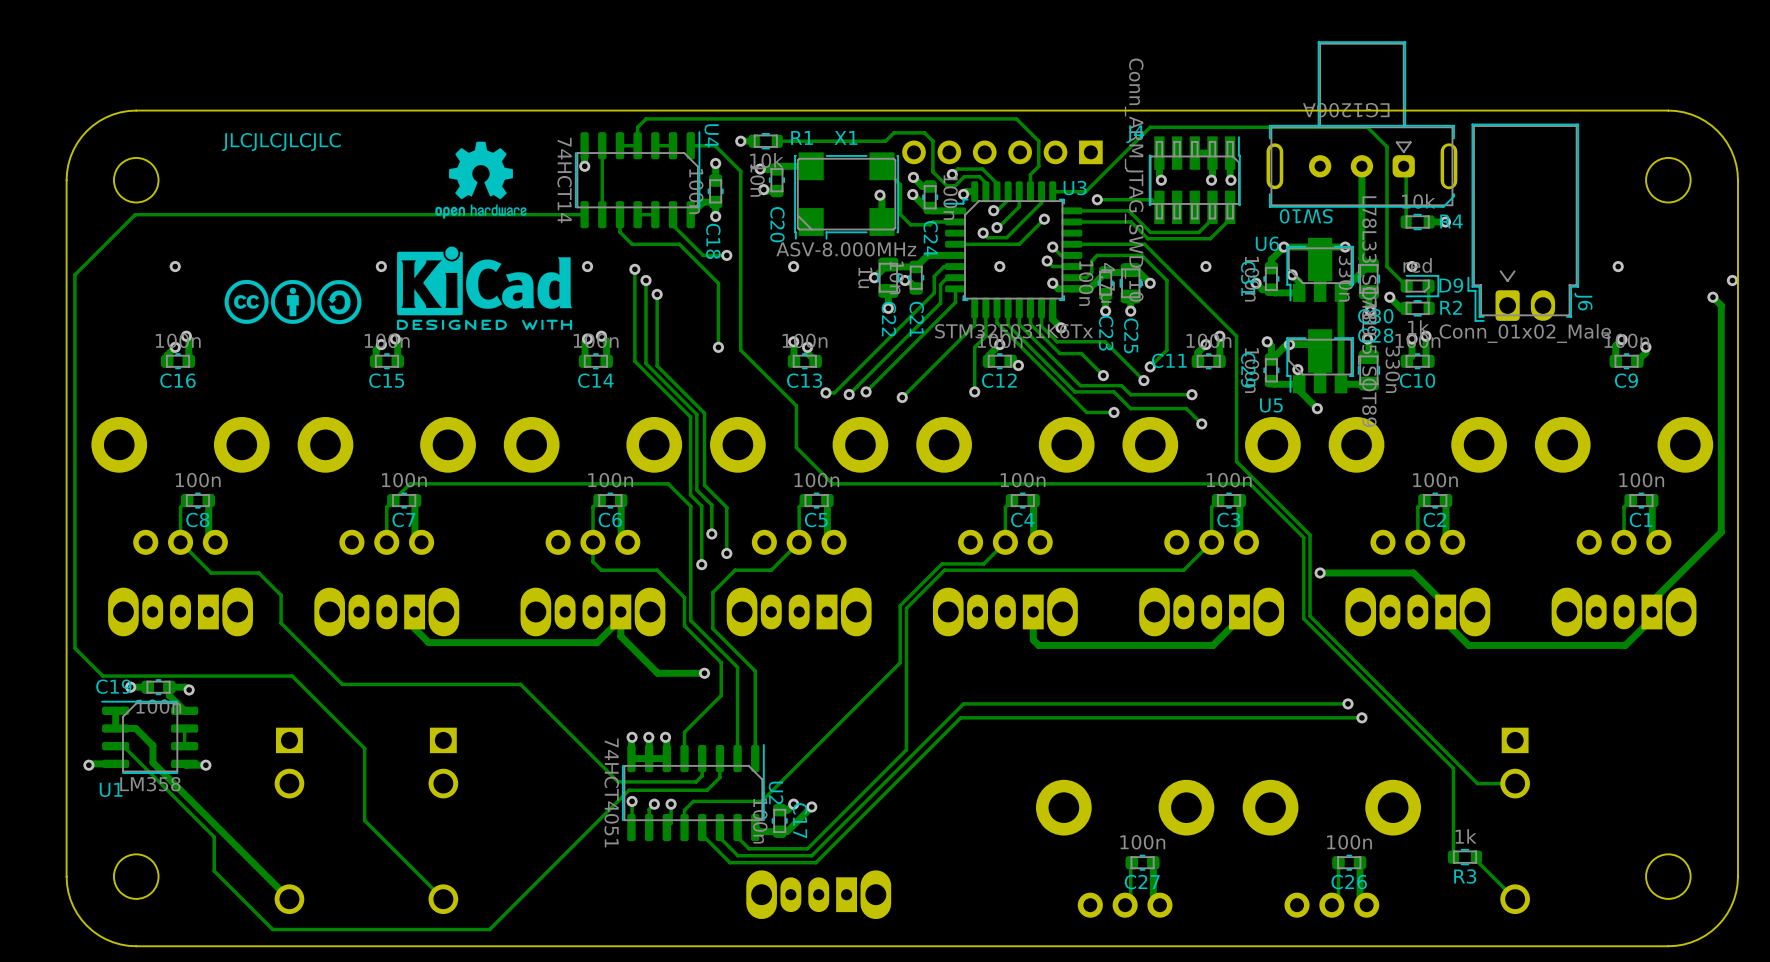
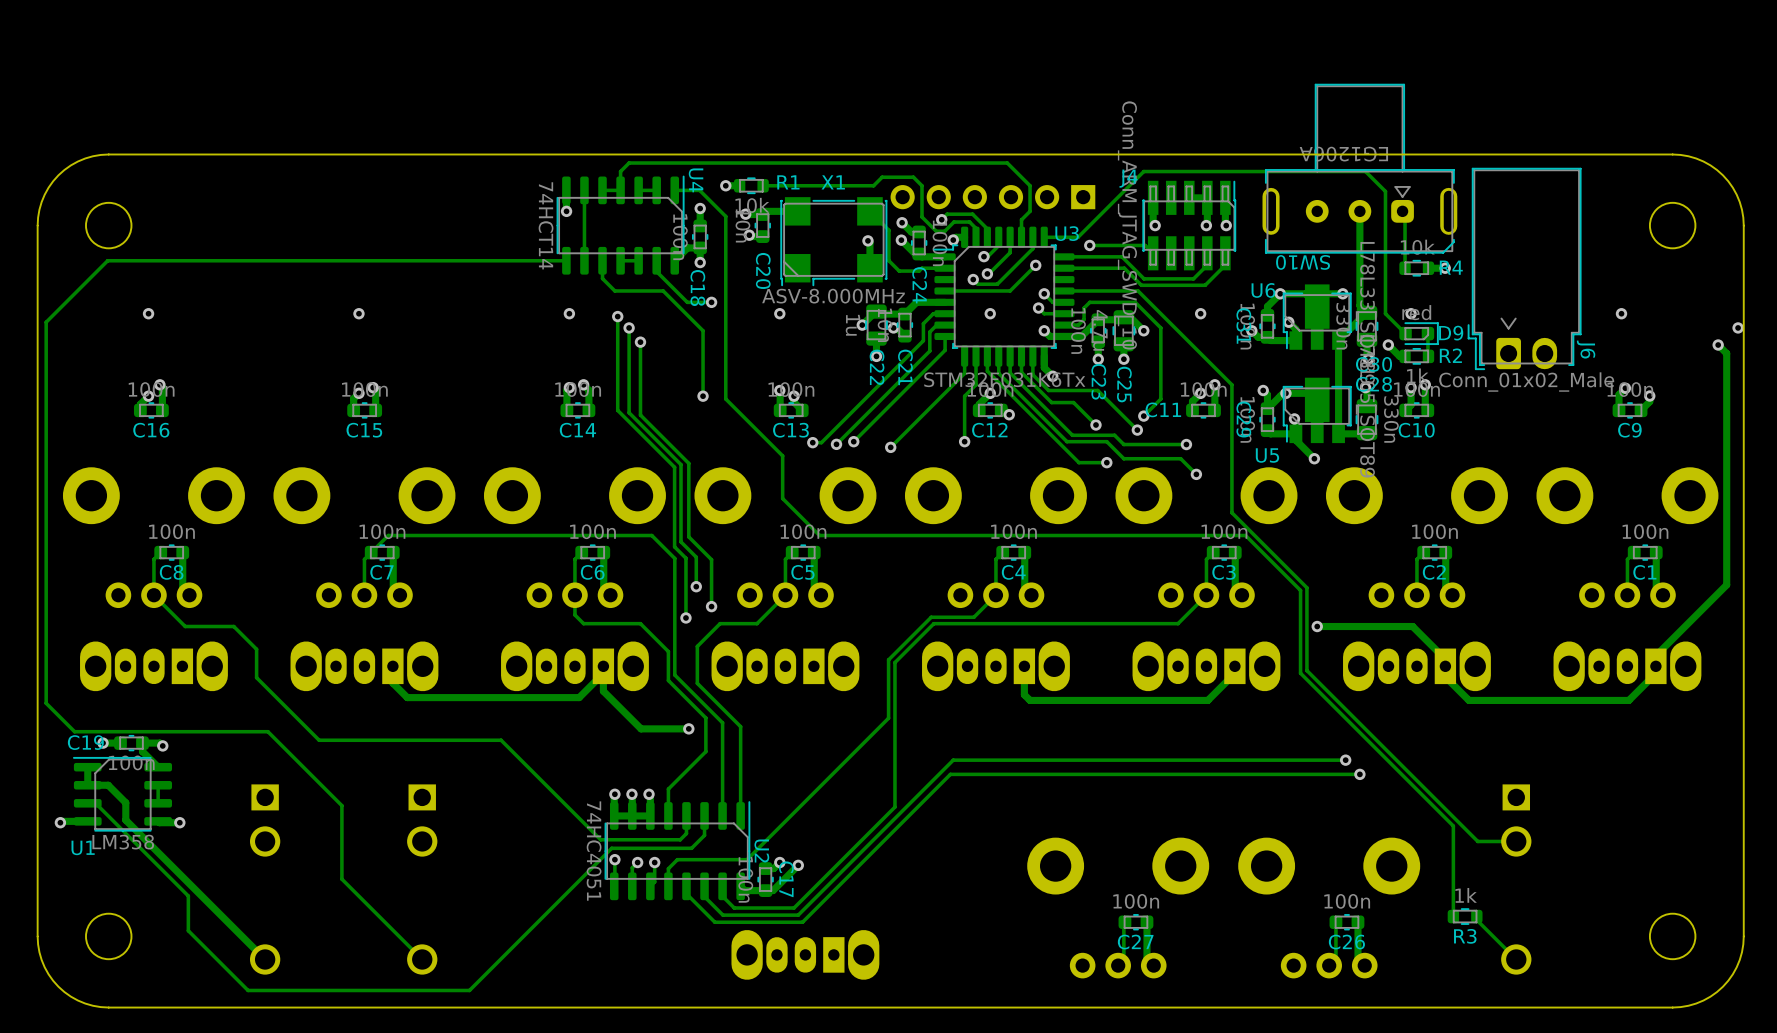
text: JLCJLCJLCJLC (281, 141) -> none
drawing: [435, 141, 527, 219] -> none
drawing: [396, 246, 573, 331] -> none
drawing: [224, 279, 362, 325] -> none
U2 value: 74HCT4051 (611, 792) -> 74HC4051 (594, 851)

